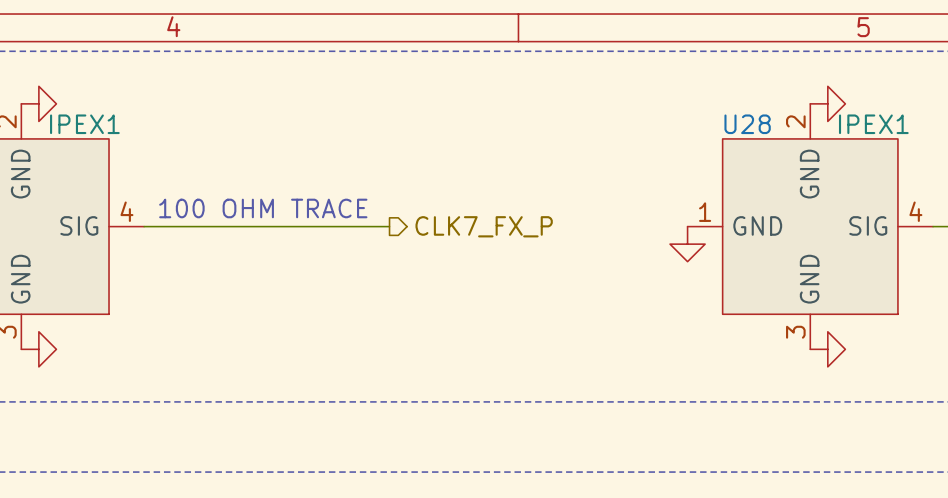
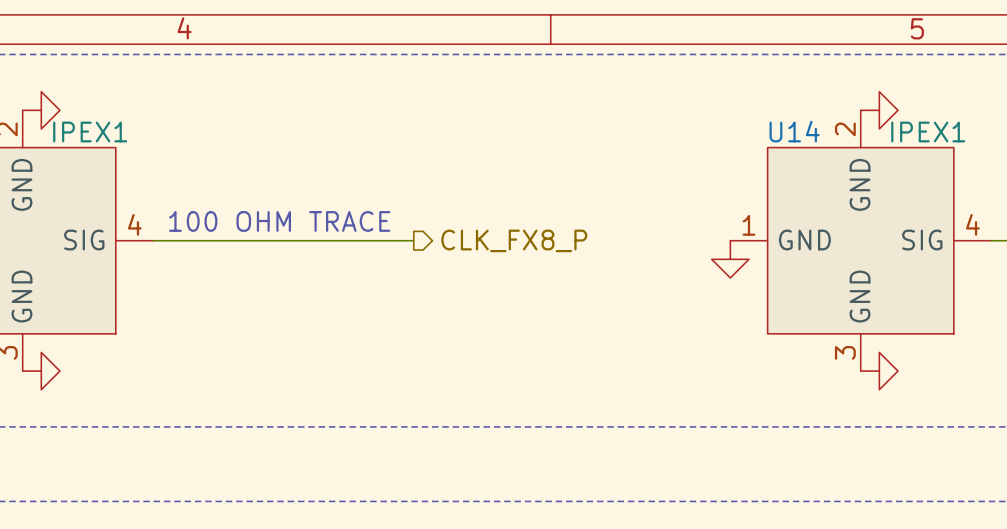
U28 name: U28 (747, 124) -> U14 (794, 131)
hierarchical label: CLK7_FX_P (484, 226) -> CLK_FX8_P (514, 240)

